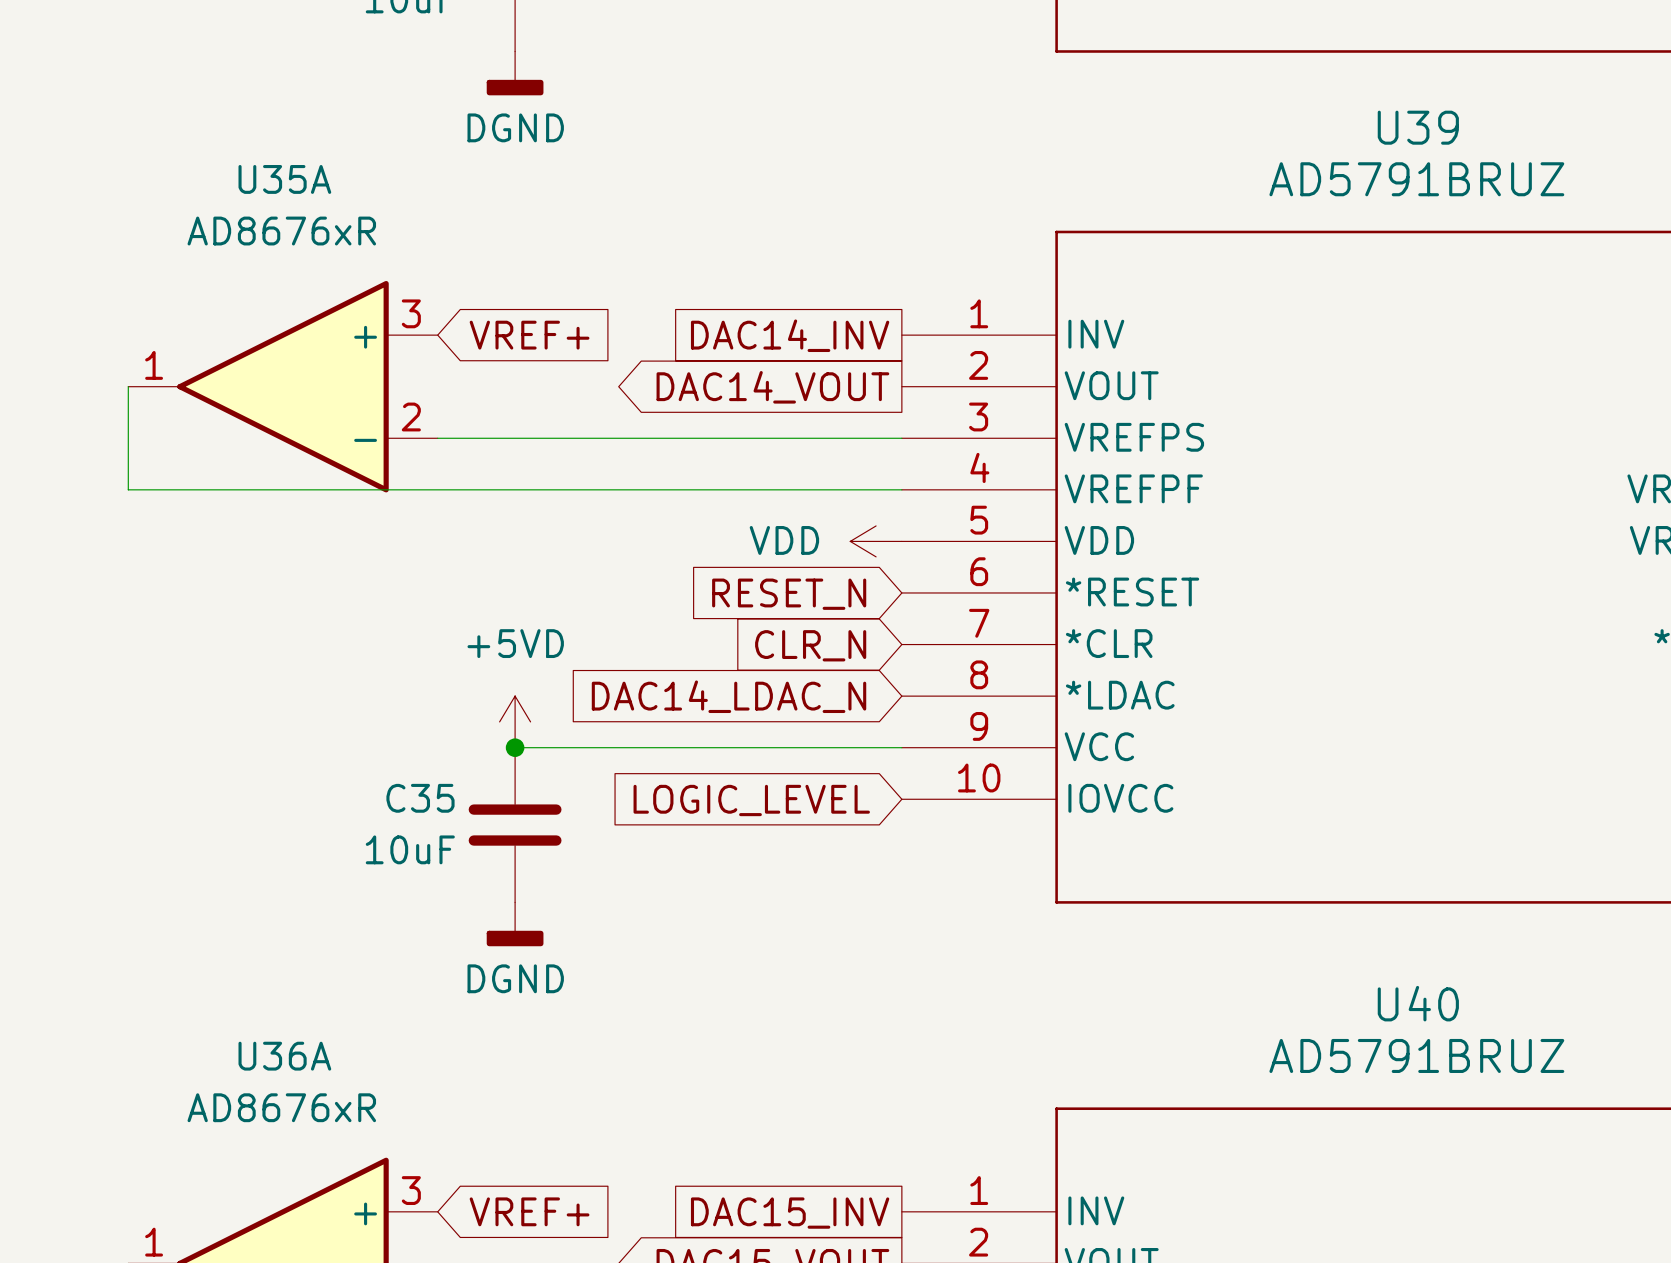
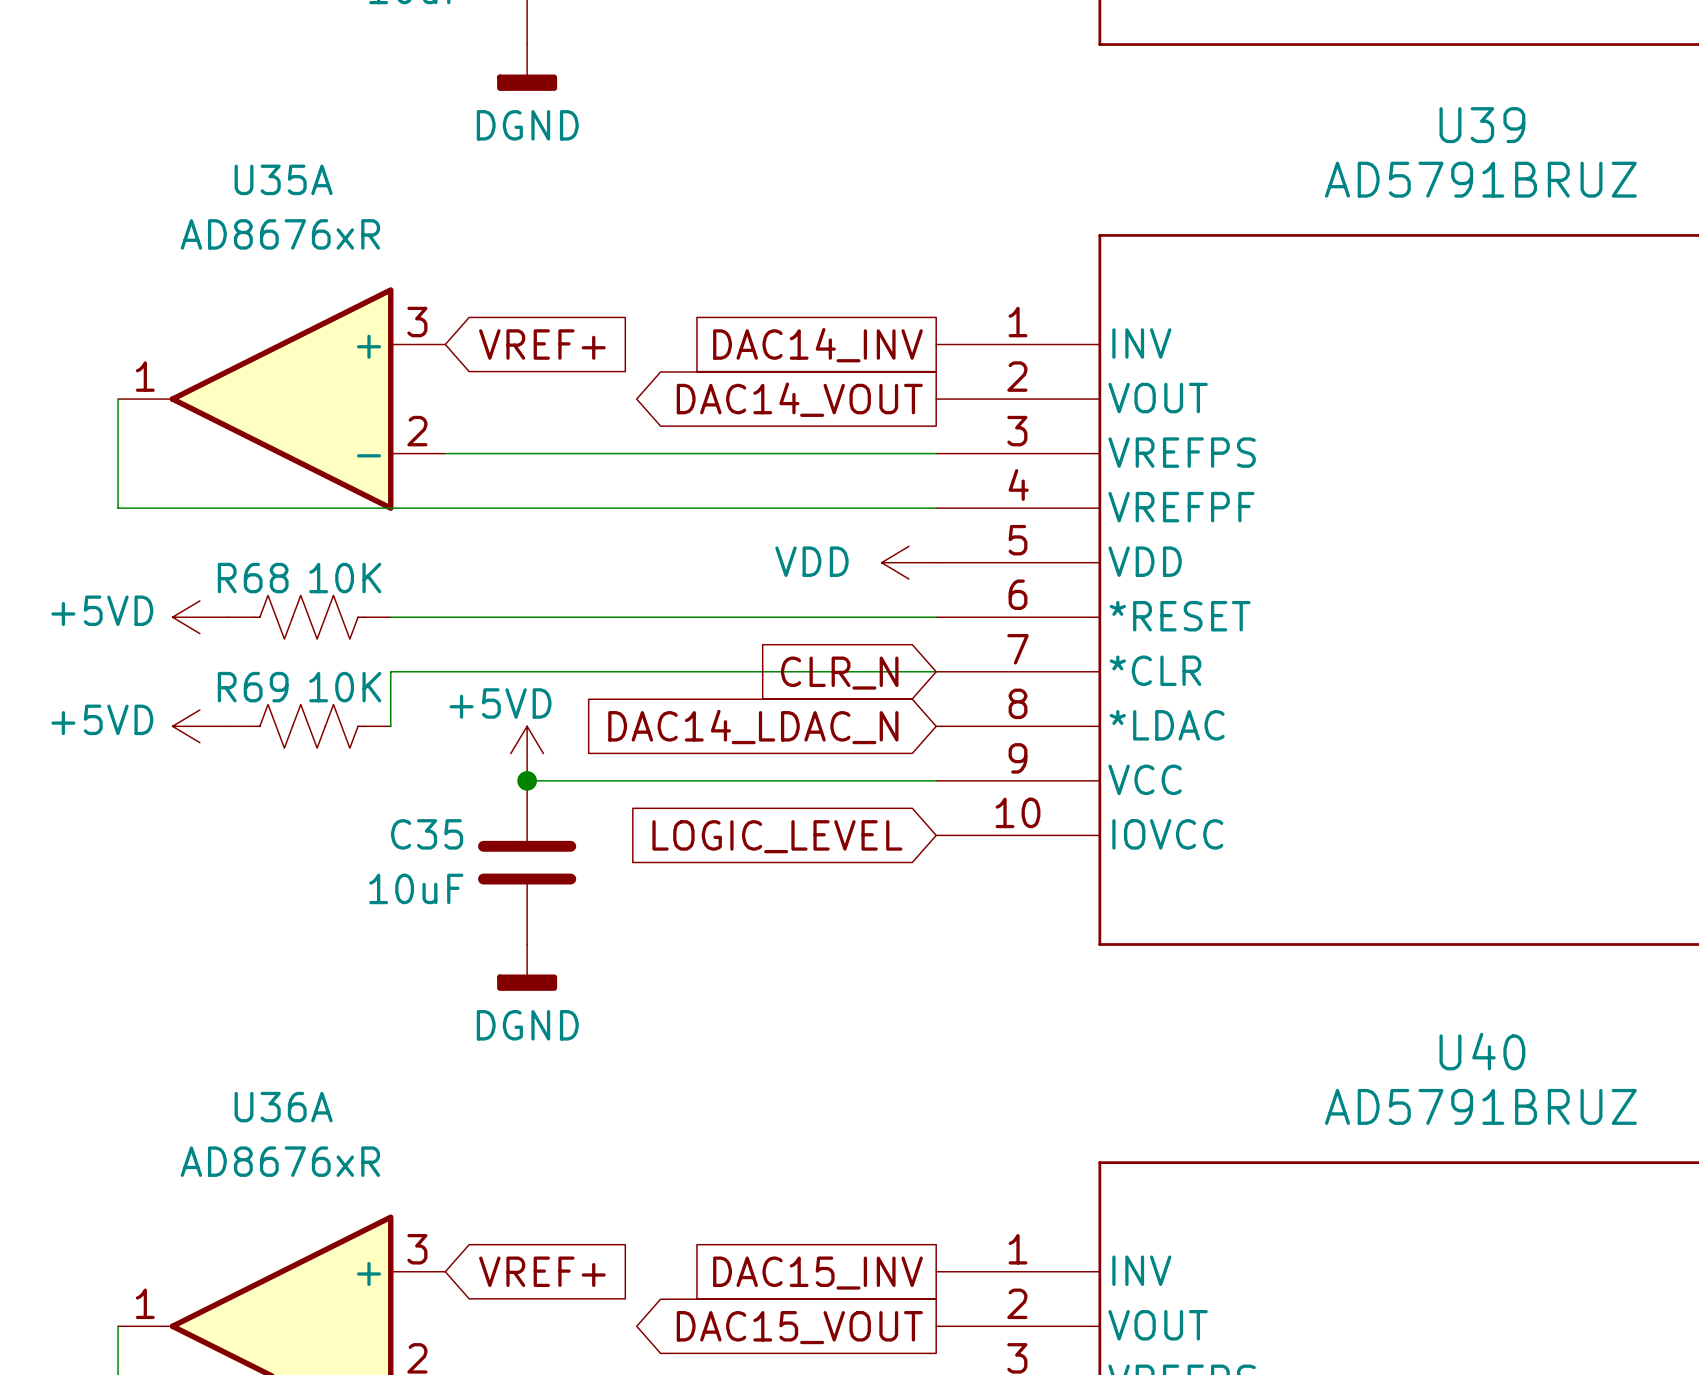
power symbol: none -> +5VD (199, 617)
R68: none -> 10K (308, 617)
wire: none -> (390, 617) (936, 617)
global label: RESET_N (789, 594) -> none
power symbol text position: +5VD (515, 643) -> +5VD (500, 703)
wire: none -> (936, 671) (390, 671) (390, 726)
power symbol: none -> +5VD (199, 726)
R69: none -> 10K (308, 726)

